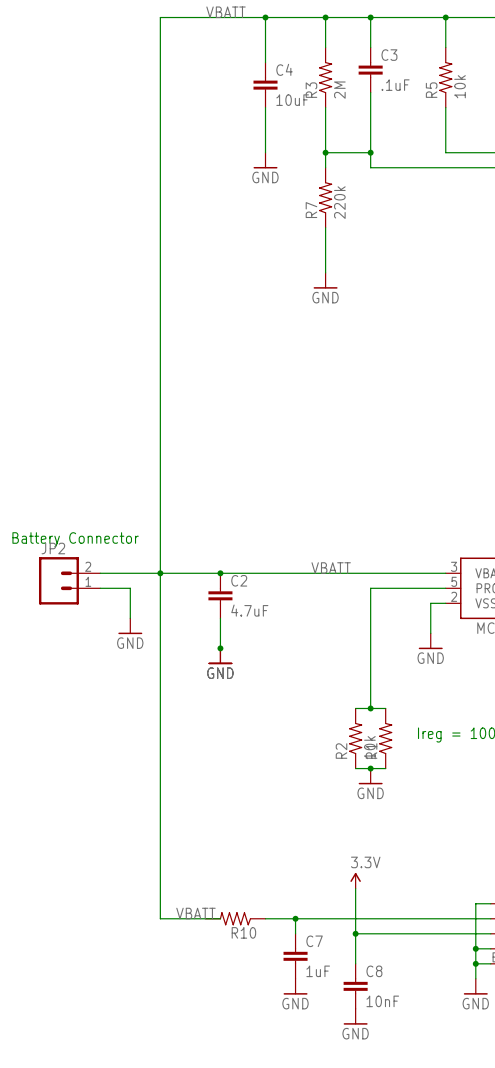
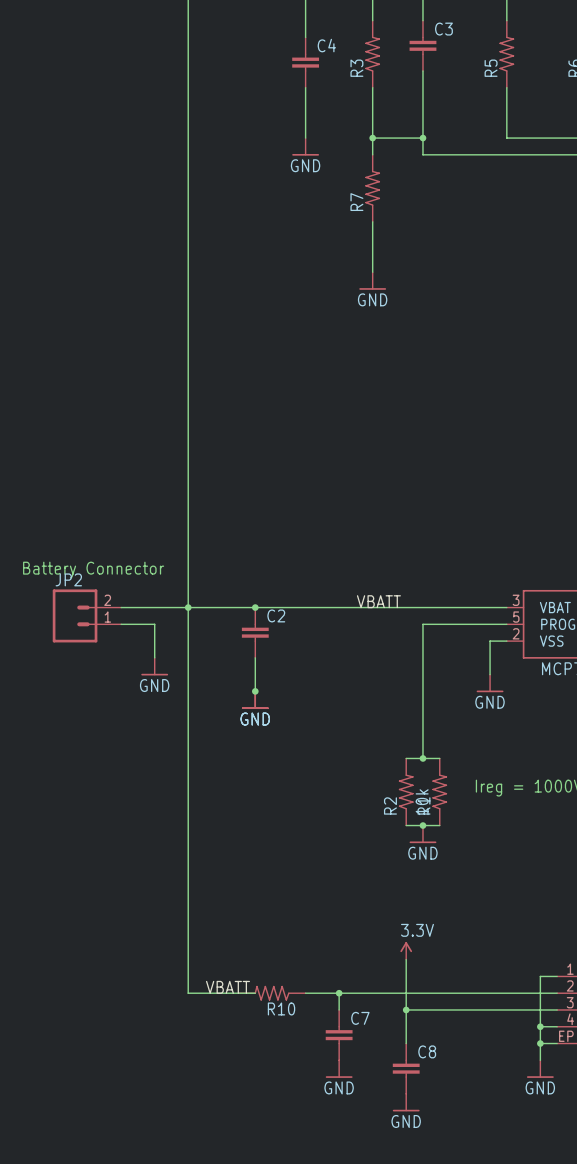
C3 value: .1uF (395, 85) -> none
R5 value: 10k (460, 86) -> none
R3 value: 2M (339, 90) -> none
C4 value: 10uF (292, 100) -> none
R7 value: 220k (339, 202) -> none
C2 value: 4.7uF (249, 610) -> none
C7 value: 1uF (318, 971) -> none
C8 value: 10nF (382, 1001) -> none

